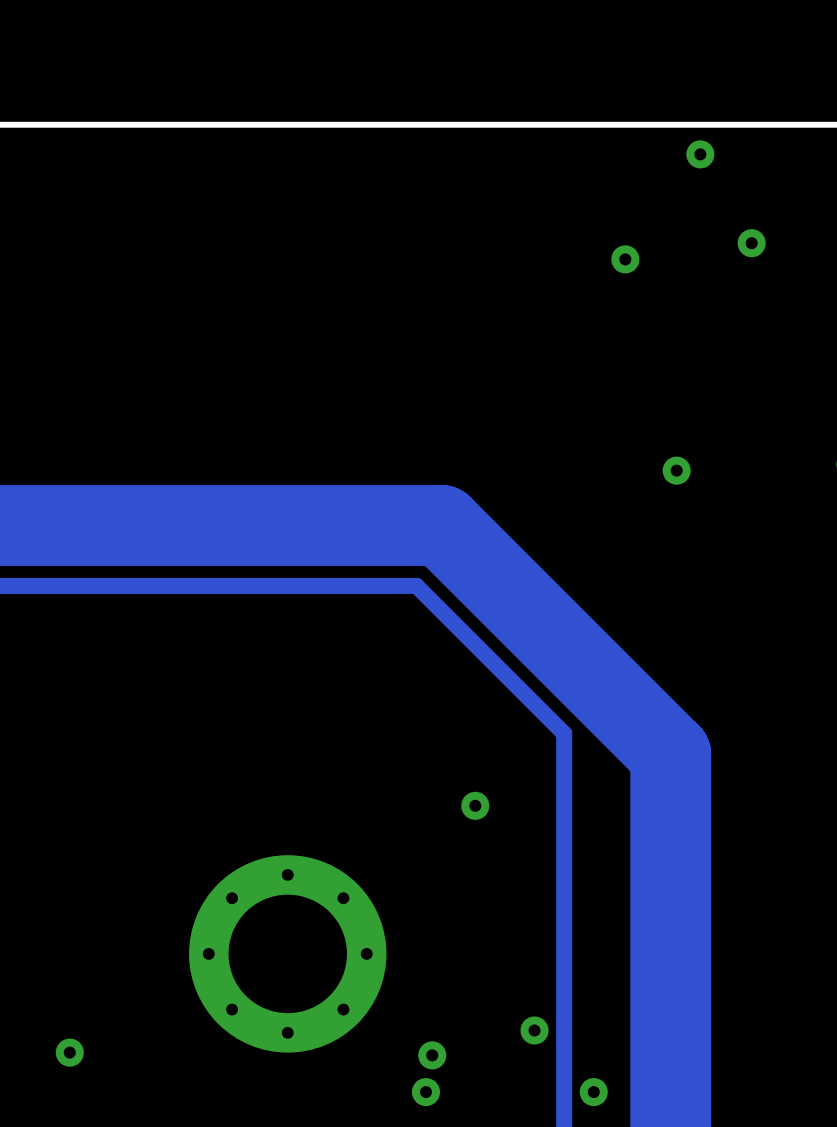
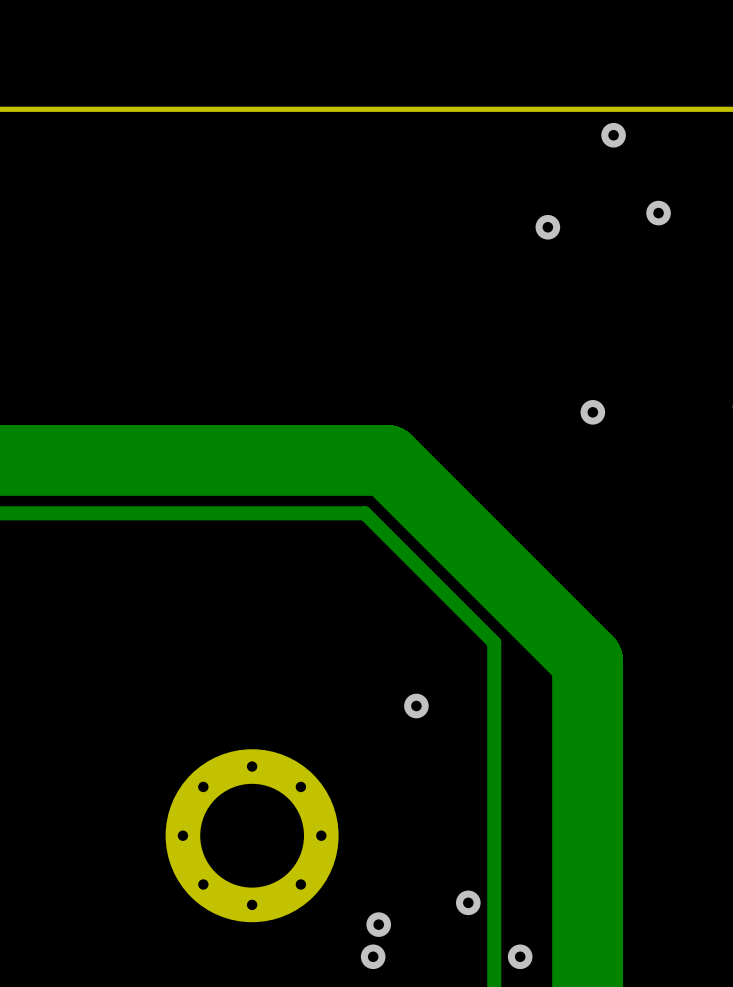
via: (69, 1052) -> none

